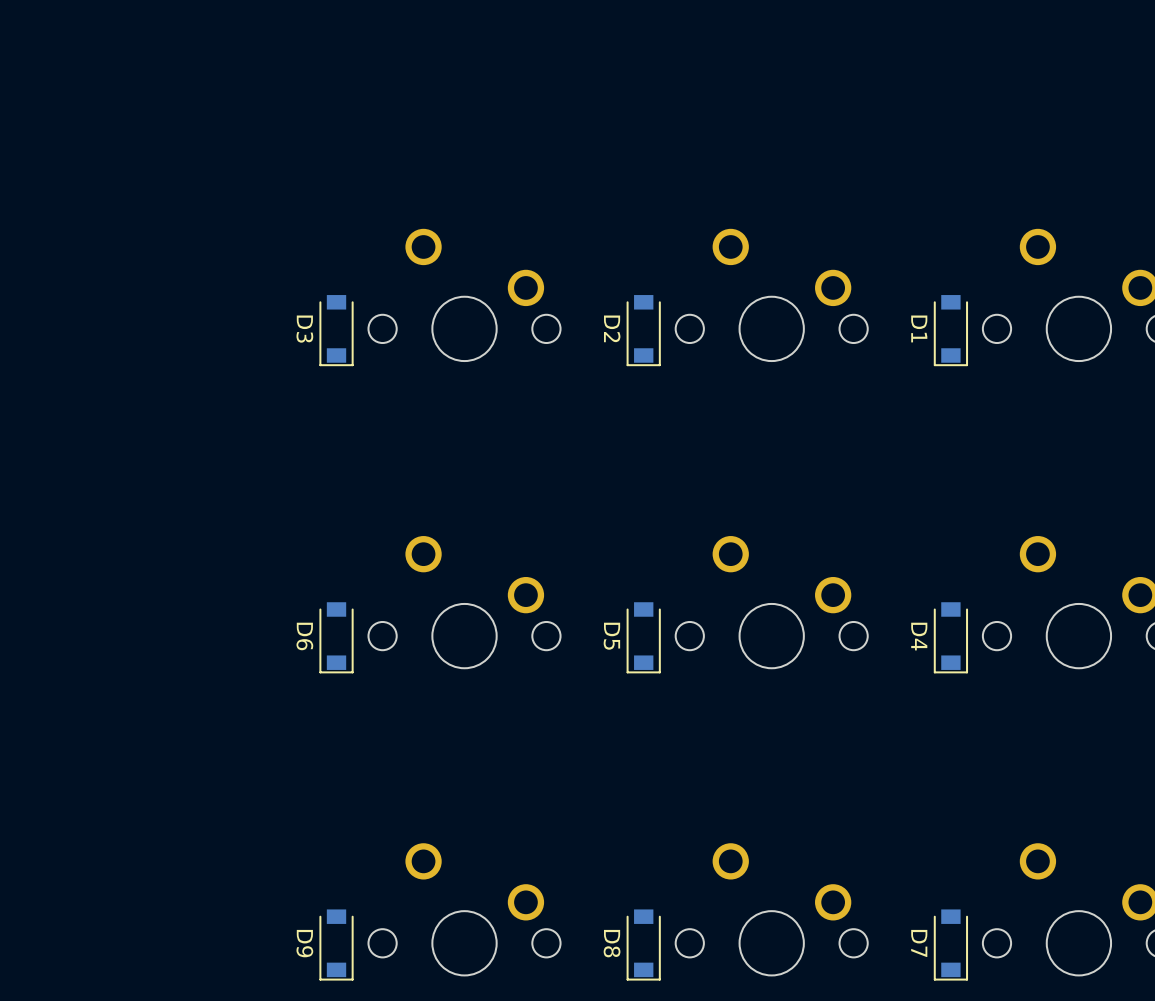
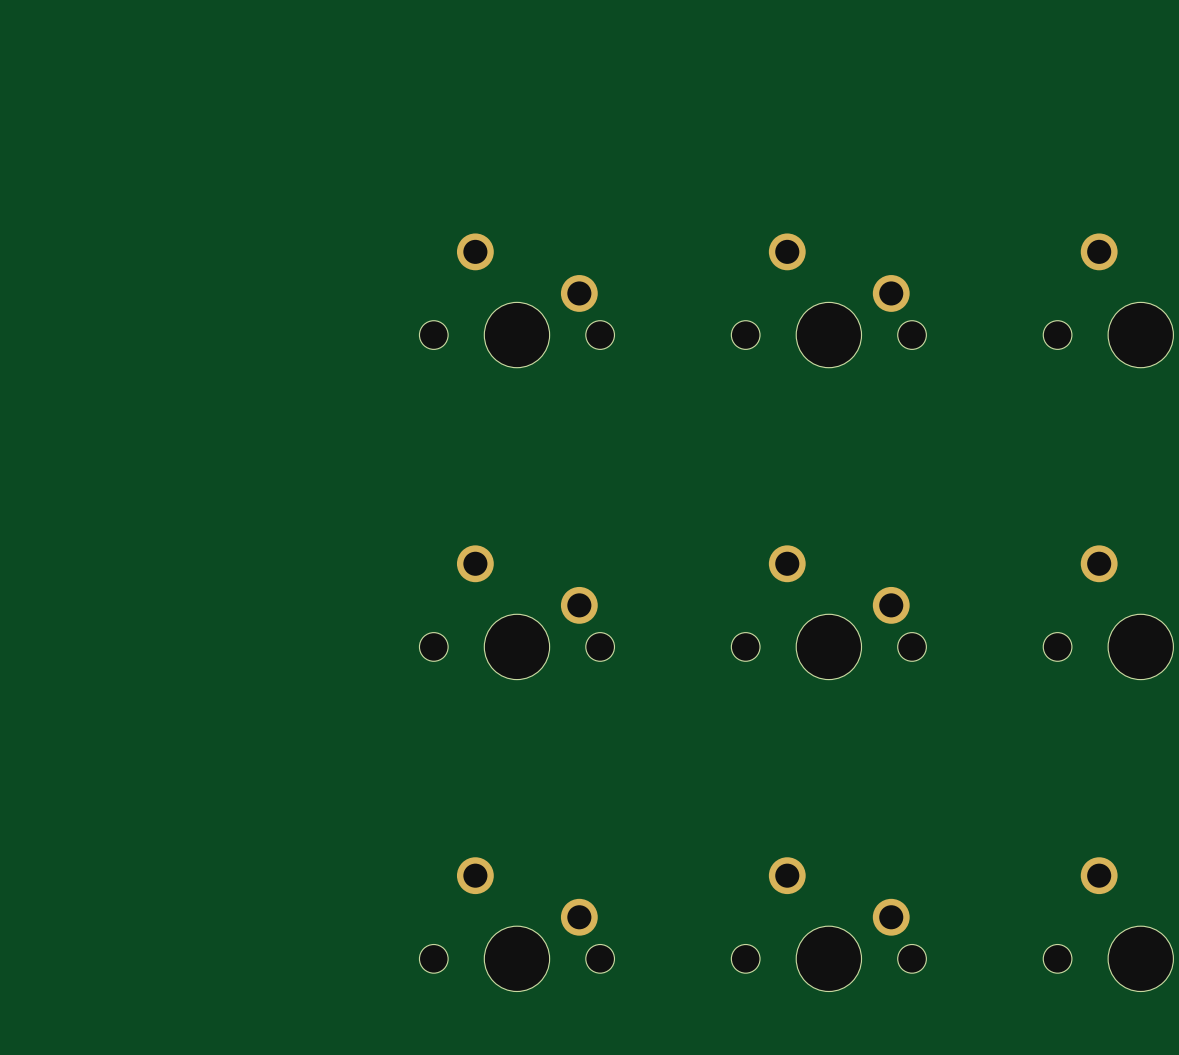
D3: (336, 330) -> none
D2: (643, 330) -> none
D1: (950, 330) -> none
D6: (336, 637) -> none
D5: (643, 637) -> none
D4: (950, 637) -> none
D9: (336, 944) -> none
D8: (643, 944) -> none
D7: (950, 944) -> none

